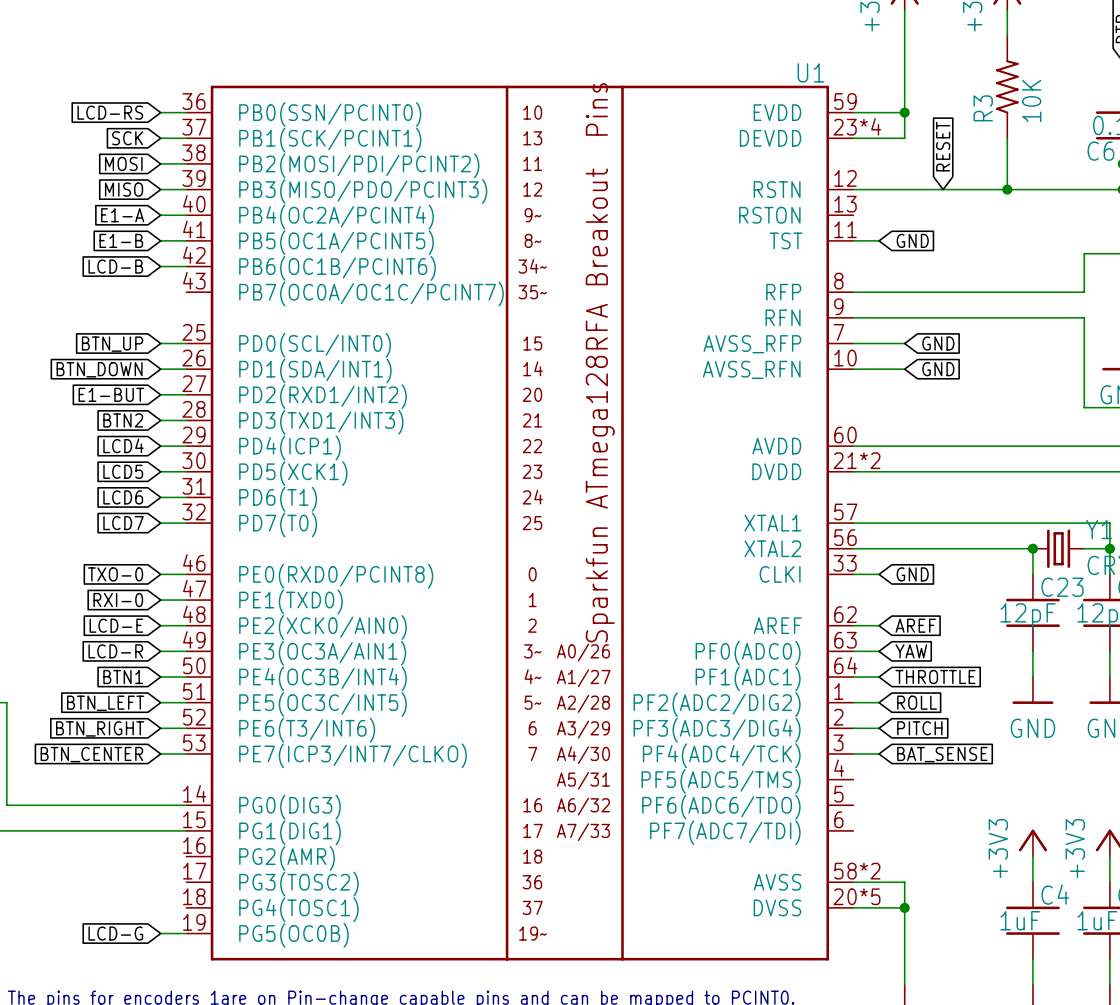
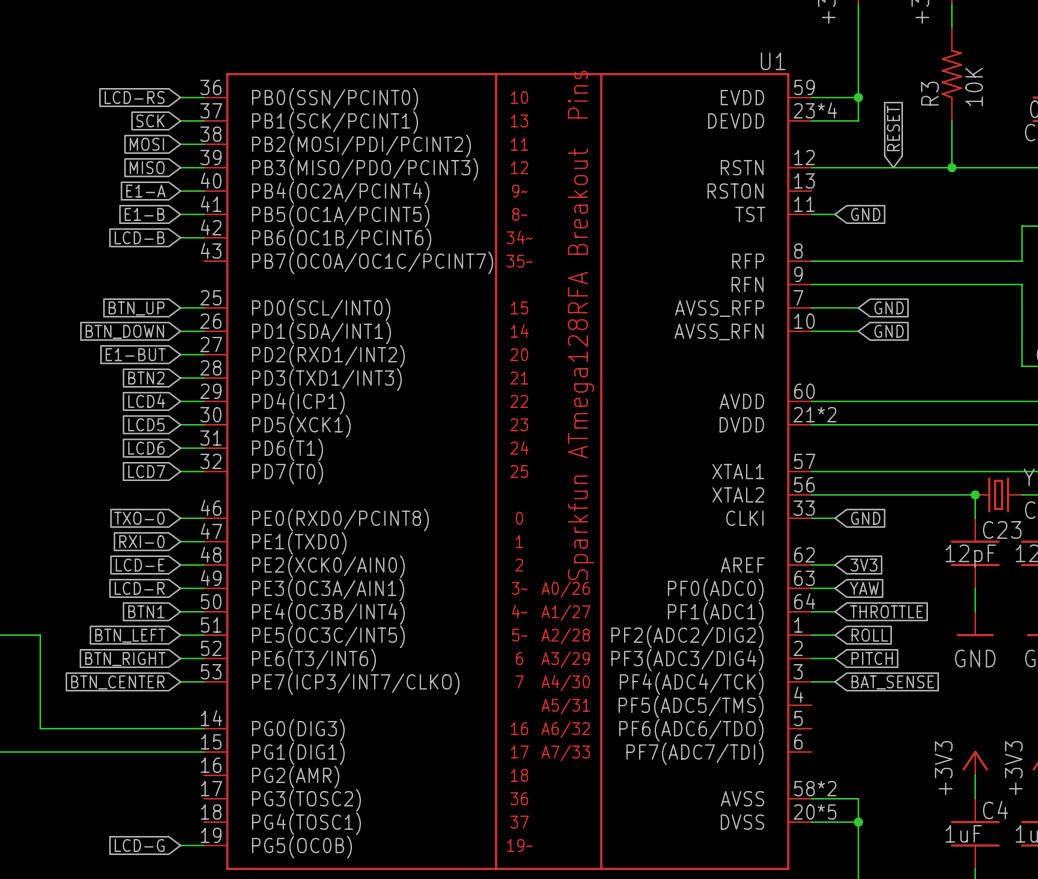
global label: AREF (915, 625) -> 3V3 (863, 565)

